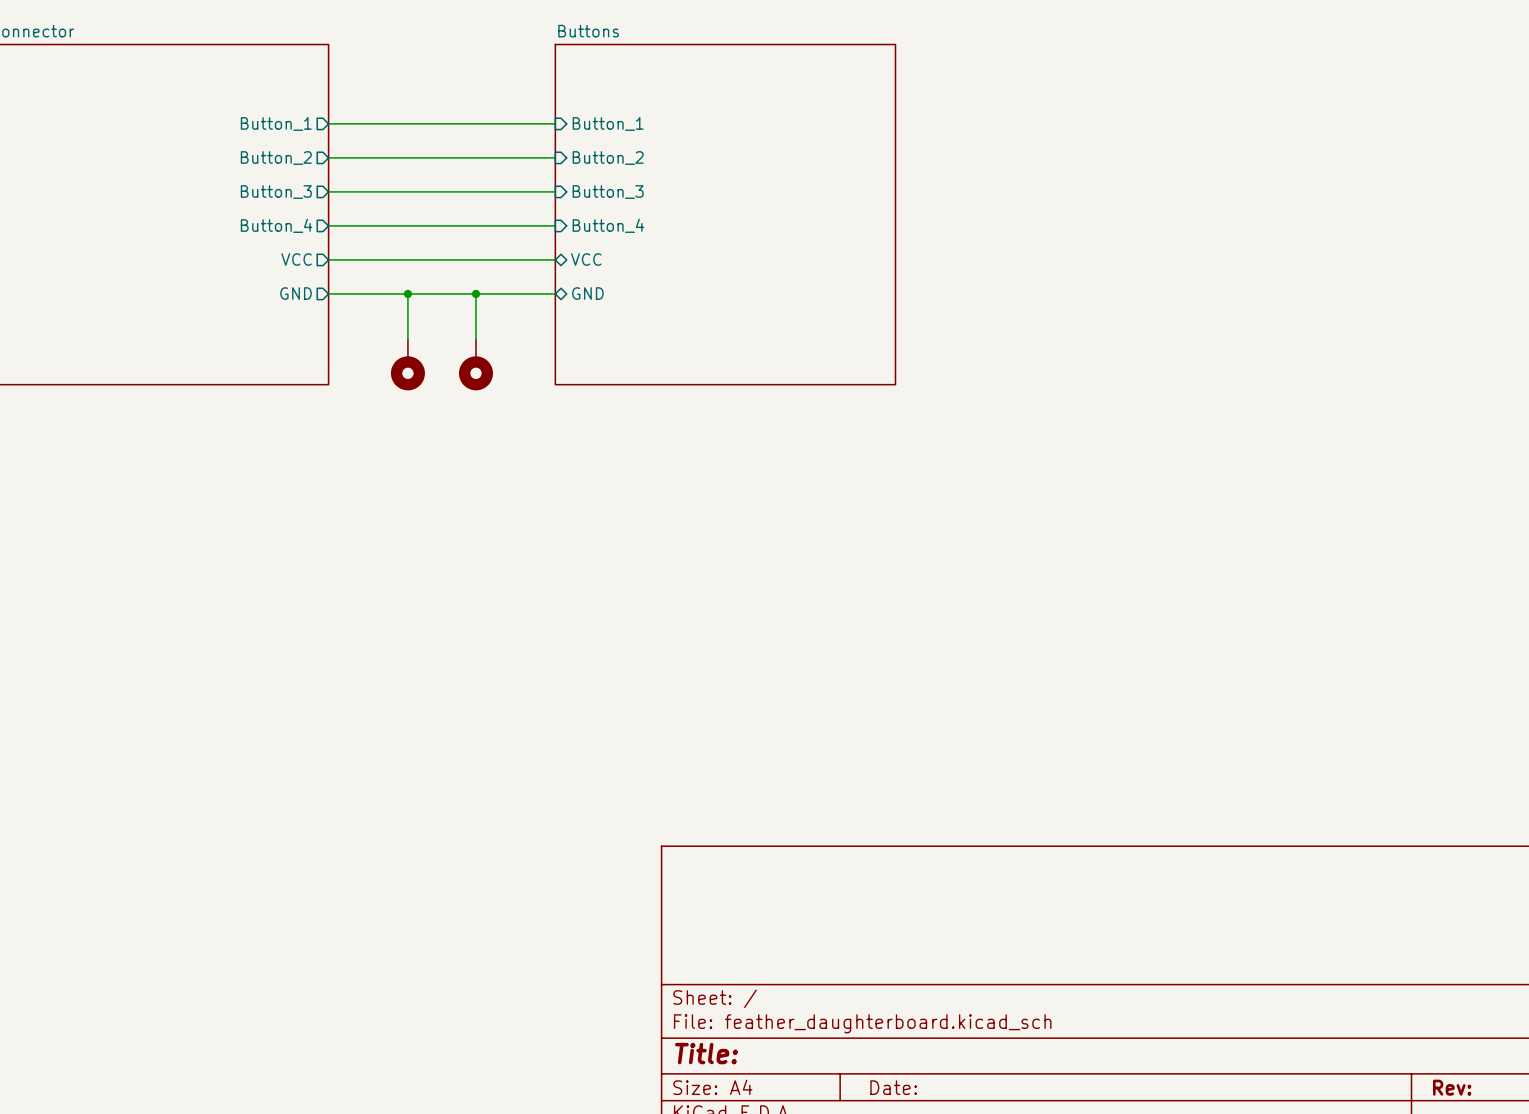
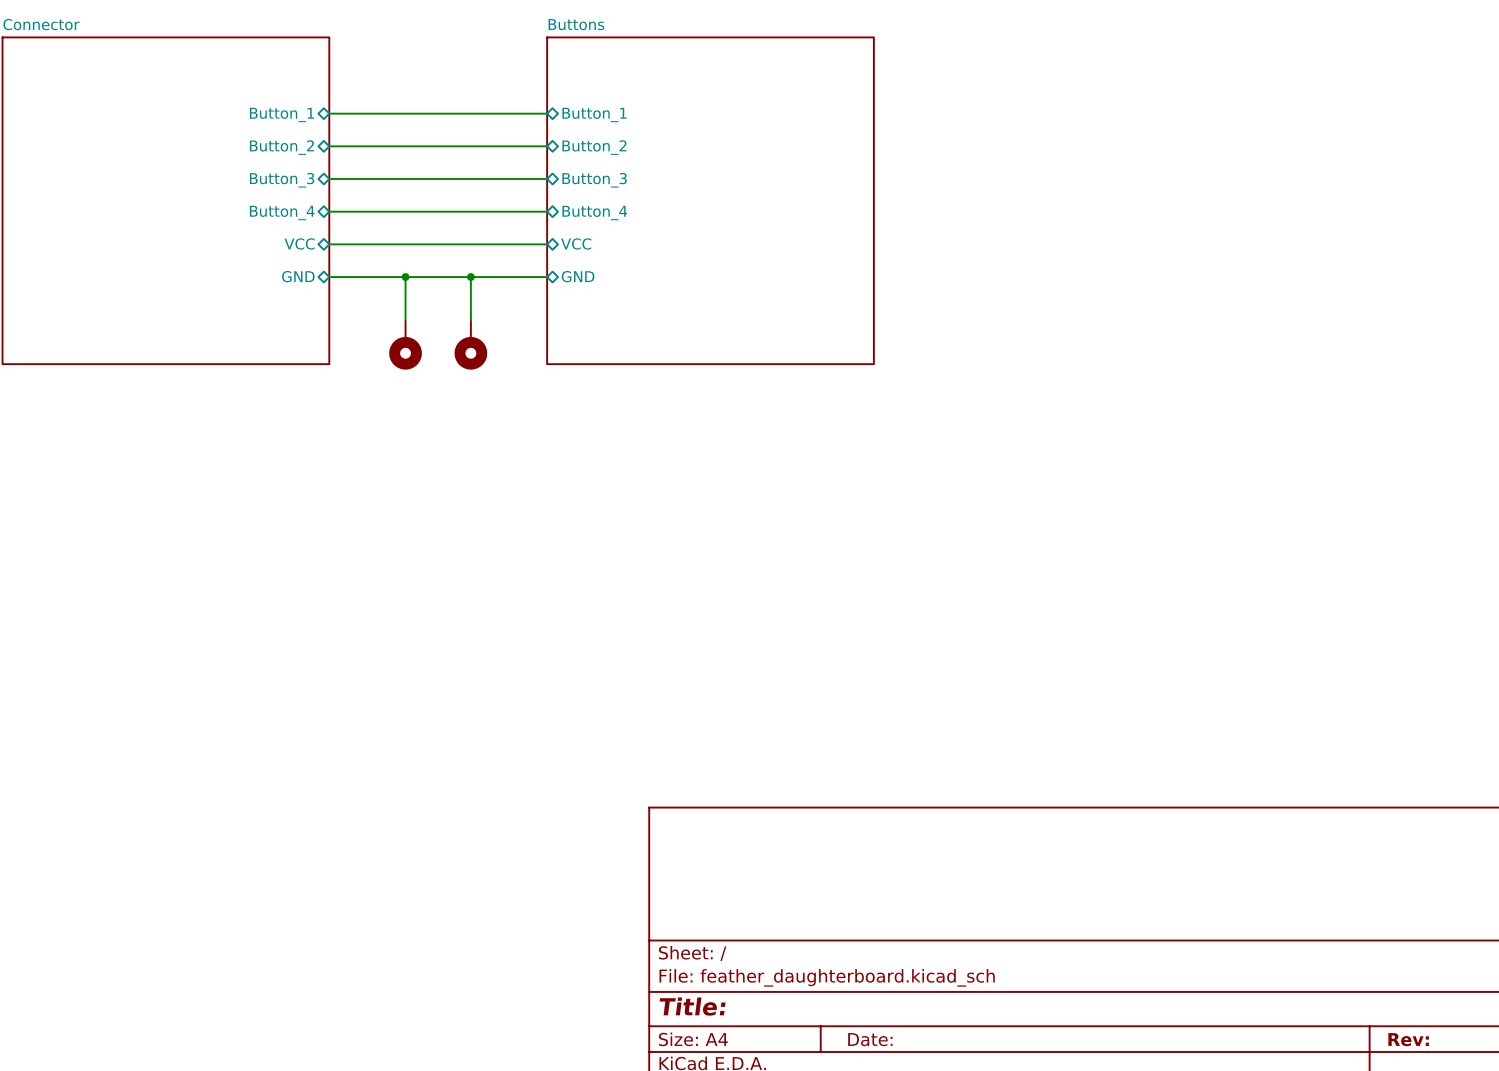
sheet pin shape: output (276, 124) -> bidirectional (281, 115)
sheet pin shape: input (608, 124) -> bidirectional (594, 115)
sheet pin shape: output (276, 158) -> bidirectional (281, 147)
sheet pin shape: input (608, 158) -> bidirectional (594, 147)
sheet pin shape: output (276, 192) -> bidirectional (282, 180)
sheet pin shape: input (608, 192) -> bidirectional (594, 180)
sheet pin shape: output (276, 225) -> bidirectional (282, 213)
sheet pin shape: input (608, 225) -> bidirectional (594, 213)
sheet pin shape: output (296, 259) -> bidirectional (299, 243)
sheet pin shape: output (296, 293) -> bidirectional (298, 276)

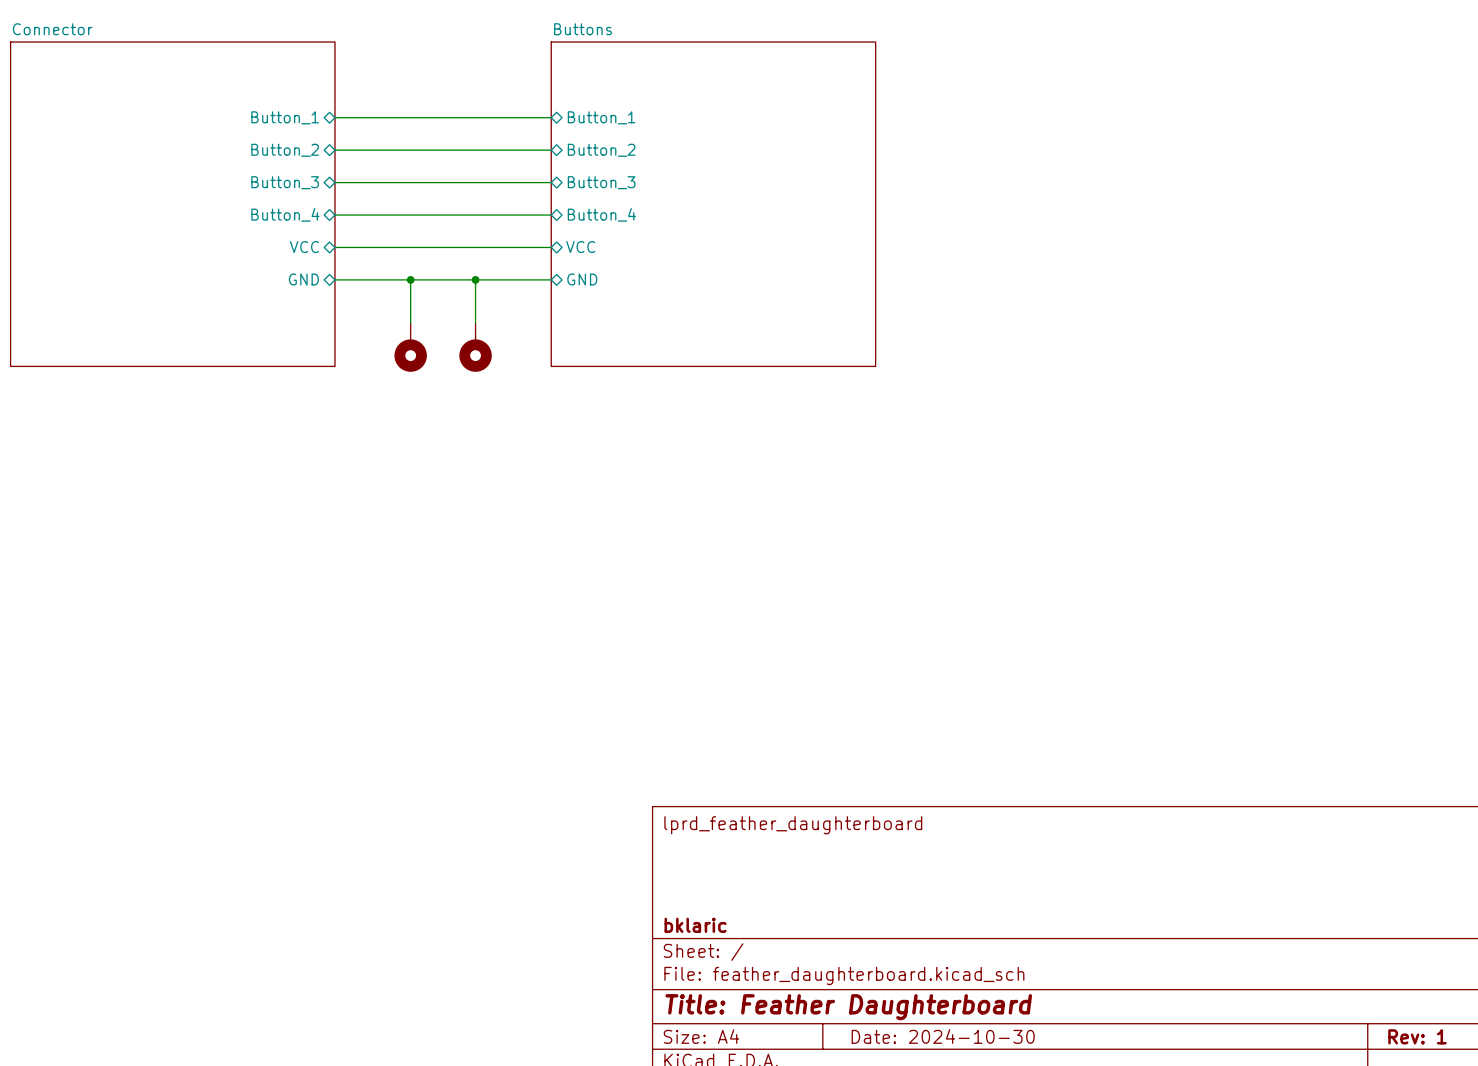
title block: none -> lprd_feather_daughterboard (793, 825)
title block: none -> bklaric (695, 925)
title block: Title: (692, 1006) -> Title: Feather Daughterboard (848, 1007)
title block: Date: (870, 1039) -> Date: 2024-10-30 (943, 1036)
title block: Rev: (1408, 1039) -> Rev: 1 (1417, 1036)

